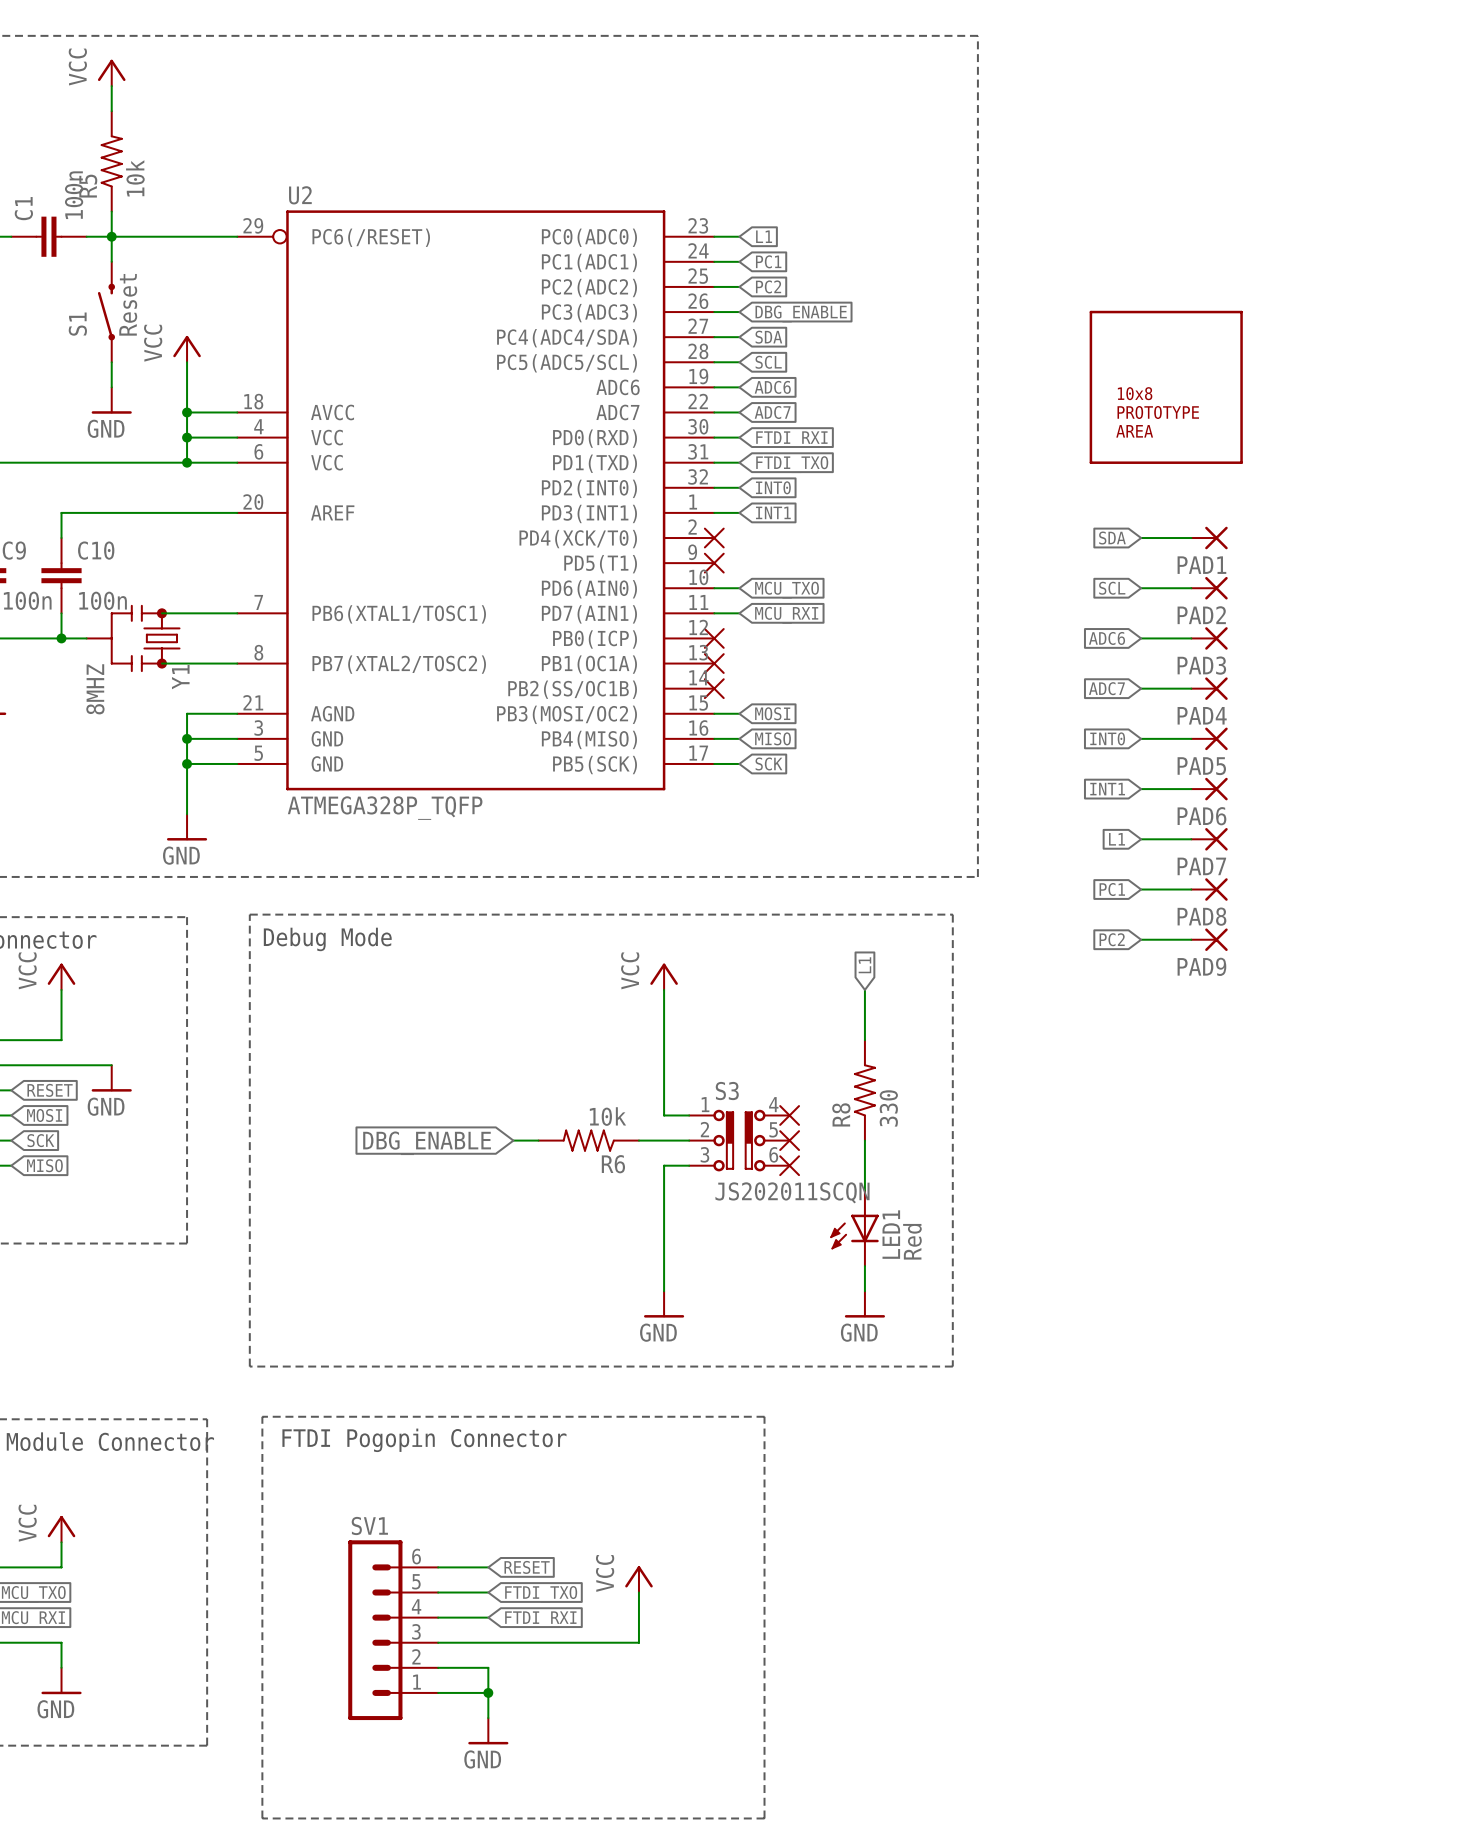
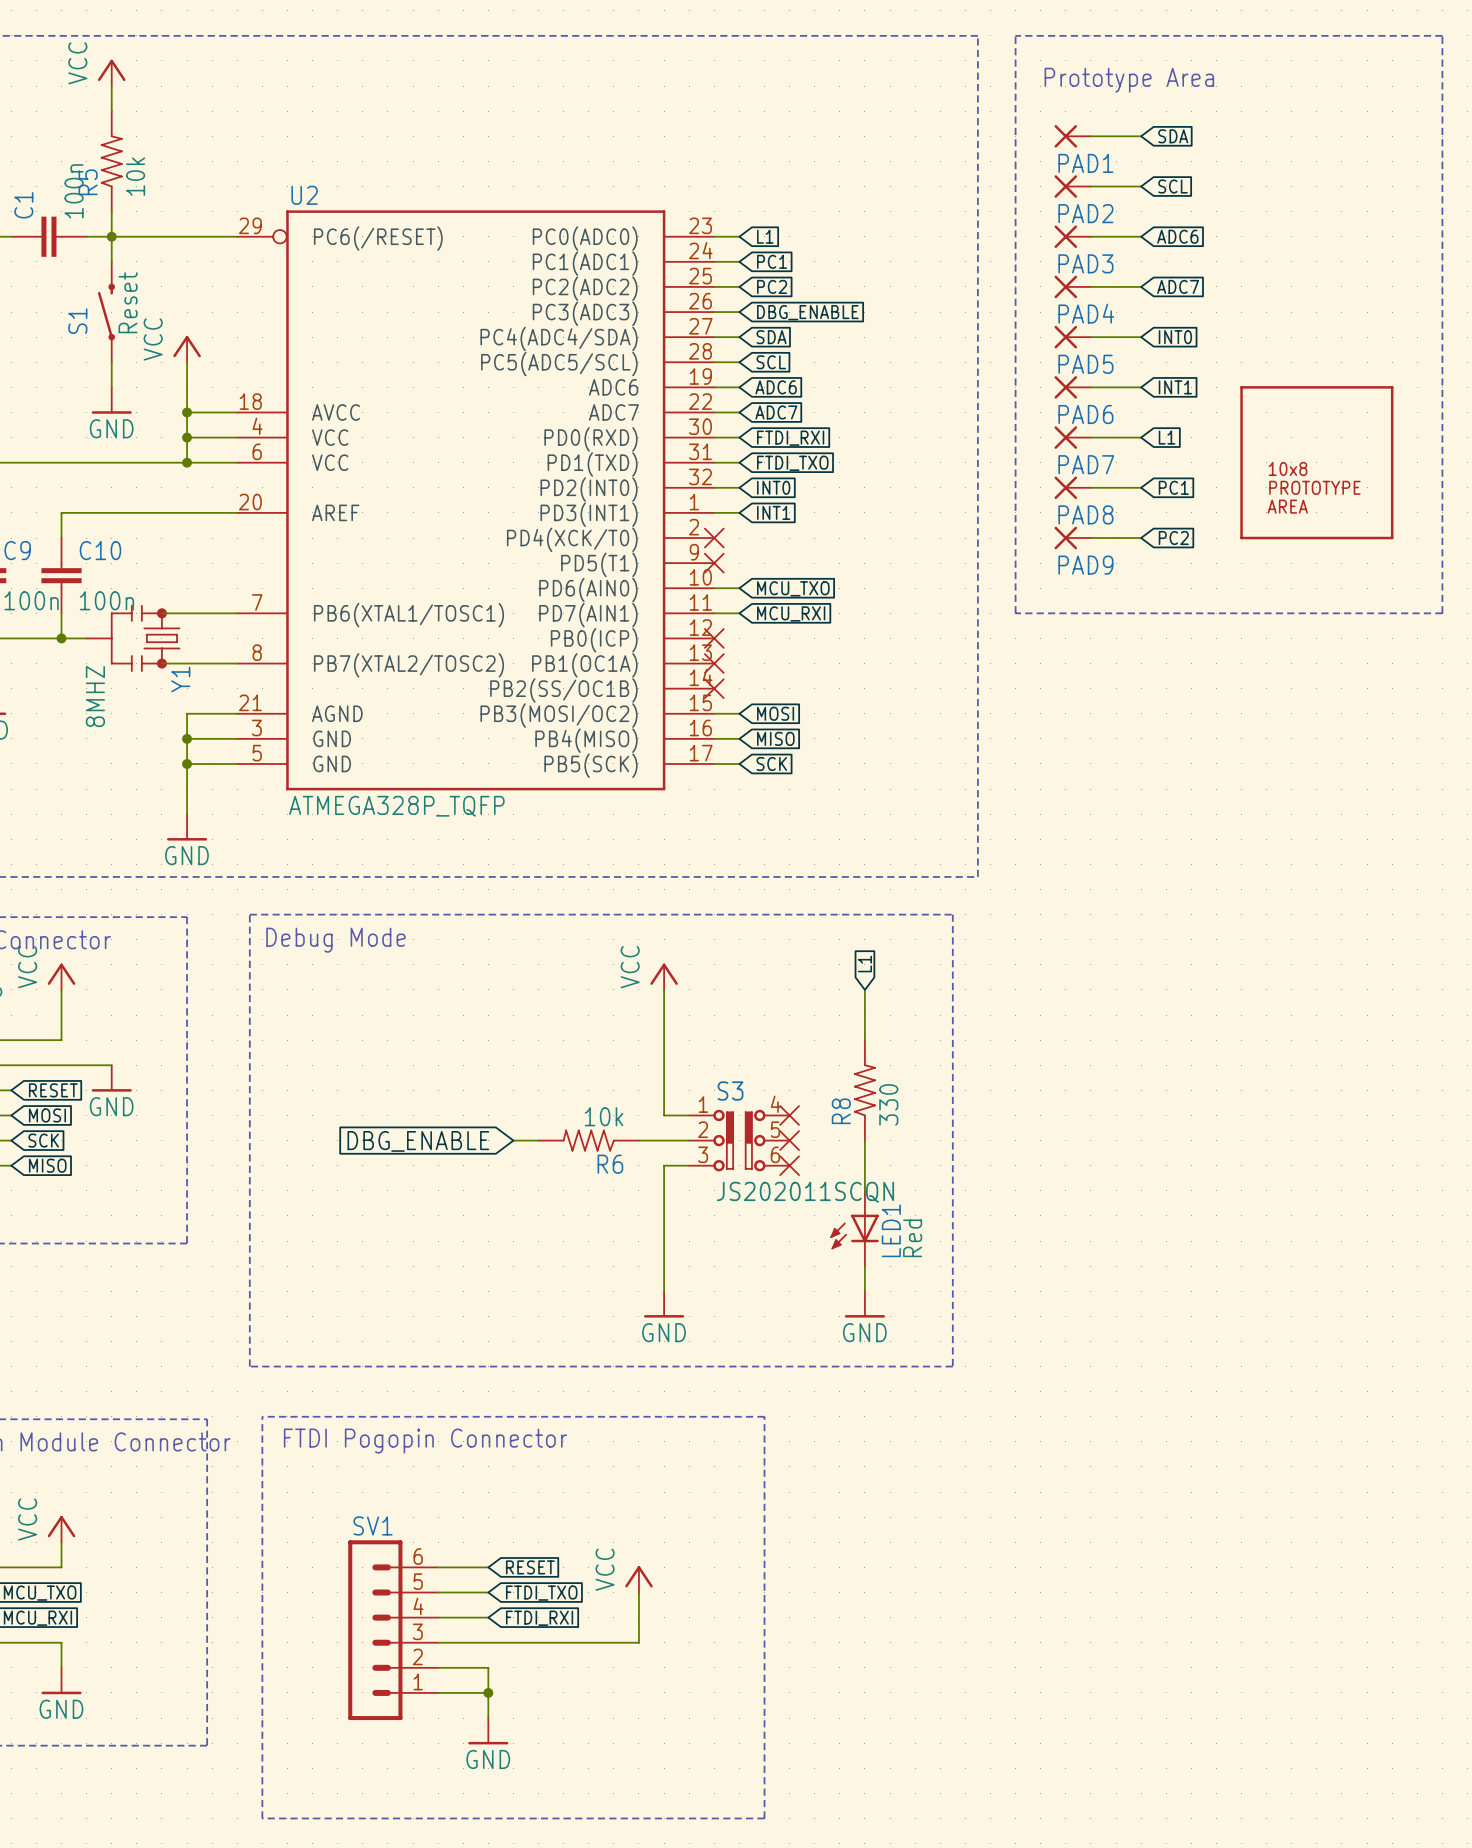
line: none -> (1015, 35) (1442, 35) (1442, 613) (1015, 613) (1015, 35)
text: none -> Prototype Area (1129, 80)
wire: none -> (1090, 136) (1141, 136)
global label: none -> SDA (1173, 136)
wire: none -> (1090, 186) (1141, 186)
global label: none -> SCL (1172, 186)
wire: none -> (1090, 236) (1141, 236)
global label: none -> ADC6 (1177, 236)
wire: none -> (1090, 286) (1141, 286)
global label: none -> ADC7 (1178, 286)
wire: none -> (1090, 337) (1141, 337)
global label: none -> INT0 (1175, 337)
part position: (1166, 387) -> (1316, 462)
global label: none -> INT1 (1175, 387)
global label: none -> L1 (1167, 437)
global label: none -> PC1 (1173, 487)
global label: SDA (1112, 538) -> PC2 (1173, 538)
wire: (1141, 538) (1191, 538) -> (1141, 538) (1090, 538)
PAD1 position: (1209, 538) -> (1072, 136)
PAD1 rotation: 0° (1216, 538) -> 180° (1065, 136)
PAD1 name position: PAD1 (1201, 565) -> PAD1 (1085, 163)
global label: SCL (1112, 588) -> none
wire: (1141, 588) (1191, 588) -> (1090, 387) (1141, 387)
PAD2 position: (1209, 588) -> (1072, 186)
PAD2 rotation: 0° (1216, 588) -> 180° (1065, 186)
PAD2 name position: PAD2 (1201, 615) -> PAD2 (1085, 213)
global label: ADC6 (1107, 638) -> none
wire: (1141, 638) (1191, 638) -> (1090, 437) (1141, 437)
PAD3 position: (1209, 638) -> (1072, 236)
PAD3 rotation: 0° (1216, 638) -> 180° (1065, 236)
PAD3 name position: PAD3 (1201, 665) -> PAD3 (1085, 263)
global label: ADC7 (1106, 688) -> none
wire: (1141, 688) (1191, 688) -> (1090, 487) (1141, 487)
PAD4 position: (1209, 688) -> (1072, 286)
PAD4 rotation: 0° (1216, 688) -> 180° (1065, 286)
PAD4 name position: PAD4 (1202, 715) -> PAD4 (1086, 313)
global label: INT0 (1107, 738) -> none
wire: (1141, 738) (1191, 738) -> none
PAD5 position: (1209, 738) -> (1072, 337)
PAD5 rotation: 0° (1216, 738) -> 180° (1065, 337)
PAD5 name position: PAD5 (1201, 766) -> PAD5 (1085, 364)
global label: INT1 (1107, 789) -> none
wire: (1141, 789) (1191, 789) -> none
PAD6 position: (1209, 789) -> (1072, 387)
PAD6 rotation: 0° (1216, 789) -> 180° (1065, 387)
PAD6 name position: PAD6 (1201, 816) -> PAD6 (1085, 414)
global label: L1 (1117, 839) -> none
wire: (1141, 839) (1191, 839) -> none
PAD7 position: (1209, 839) -> (1072, 437)
PAD7 rotation: 0° (1216, 839) -> 180° (1065, 437)
PAD7 name position: PAD7 (1201, 866) -> PAD7 (1086, 464)
global label: PC1 (1112, 889) -> none
wire: (1141, 889) (1191, 889) -> none
PAD8 position: (1209, 889) -> (1072, 487)
PAD8 rotation: 0° (1216, 889) -> 180° (1065, 487)
PAD8 name position: PAD8 (1201, 916) -> PAD8 (1085, 514)
global label: PC2 (1112, 939) -> none
wire: (1141, 939) (1191, 939) -> none
PAD9 position: (1209, 939) -> (1072, 538)
PAD9 rotation: 0° (1216, 939) -> 180° (1065, 538)
PAD9 name position: PAD9 (1201, 966) -> PAD9 (1085, 565)

